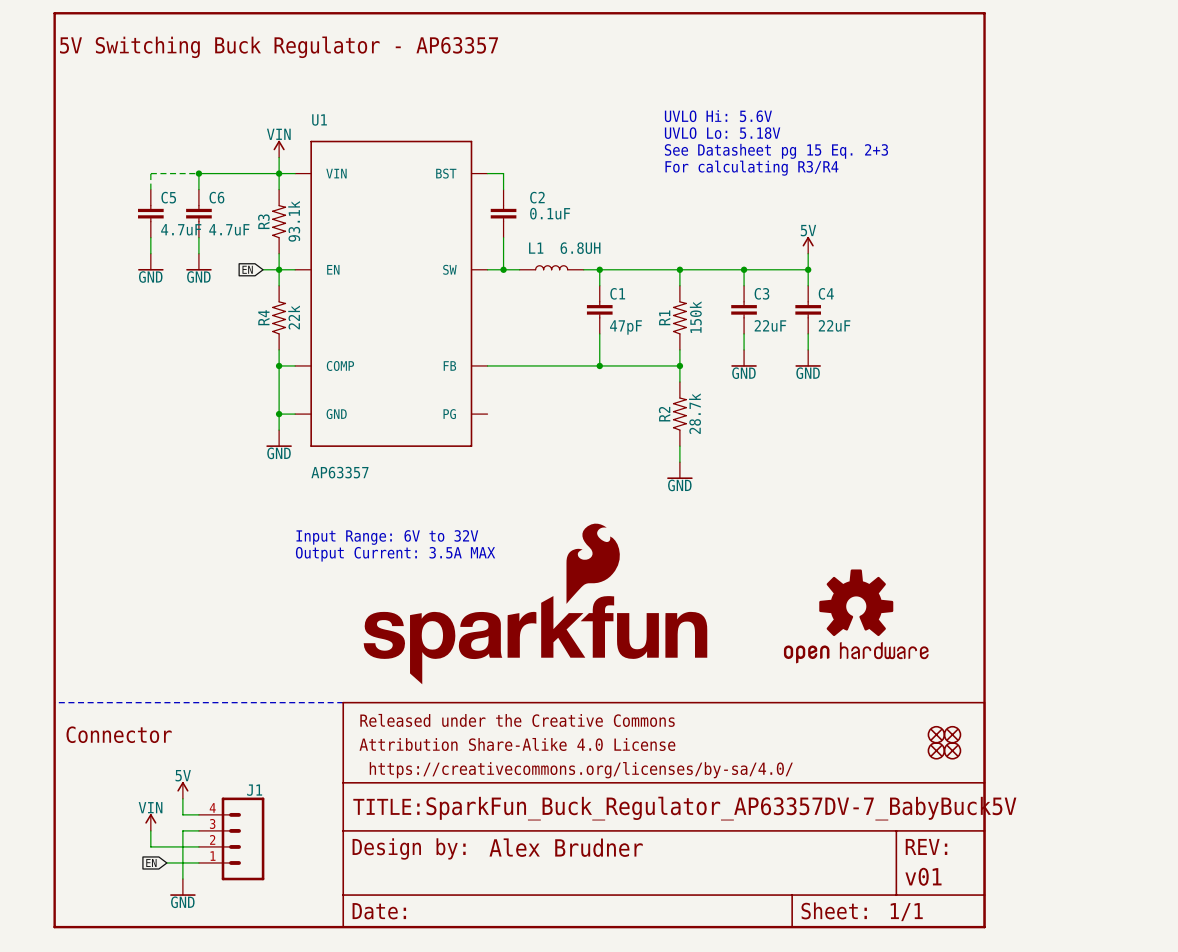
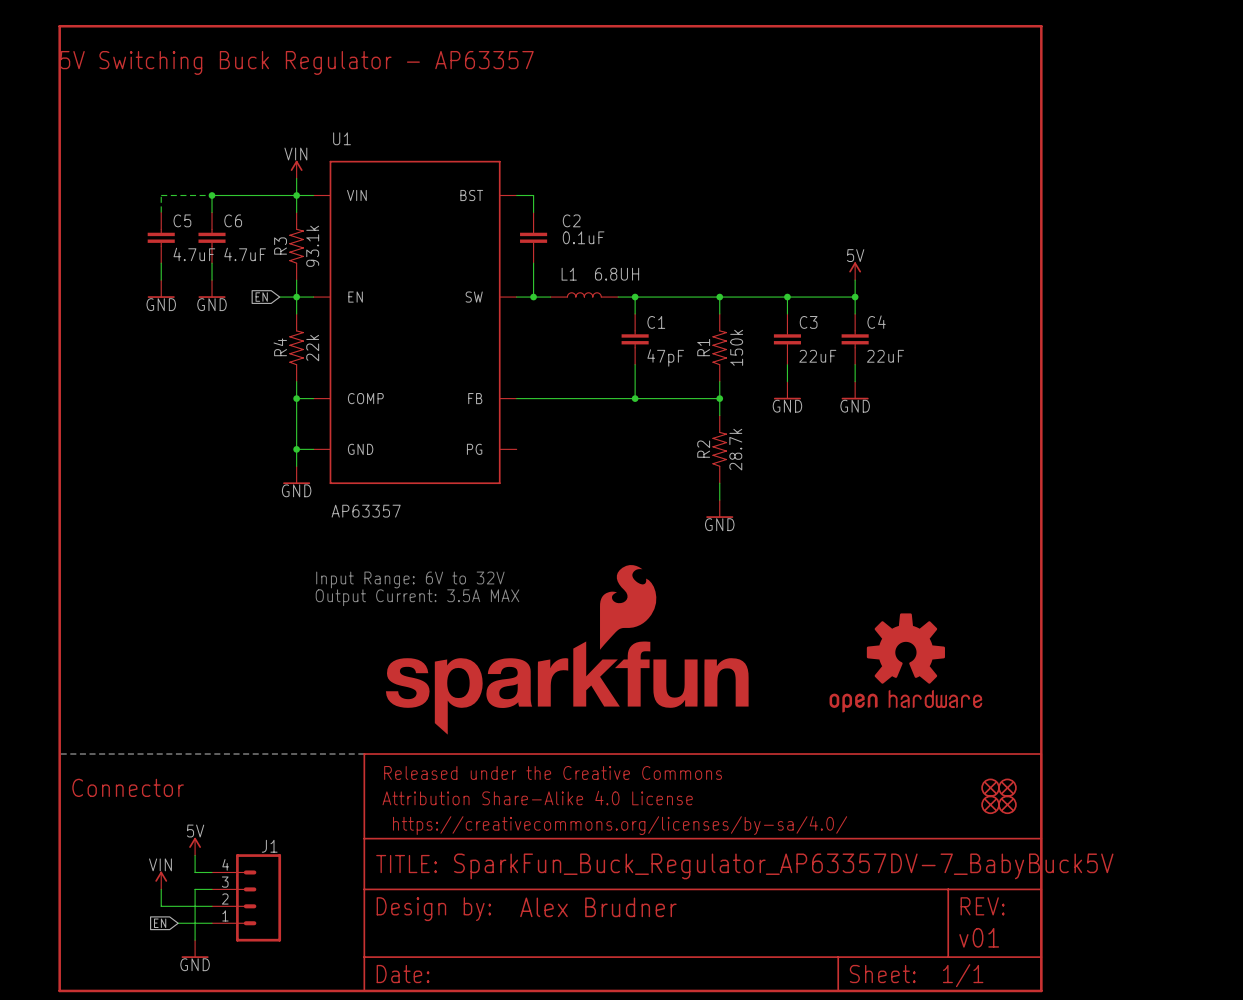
text: UVLO Hi: 5.6V (718, 116) -> none
text: UVLO Lo: 5.18V (722, 133) -> none
text: See Datasheet pg 15 Eq. 2+3 (776, 151) -> none
text: For calculating R3/R4 (751, 168) -> none

